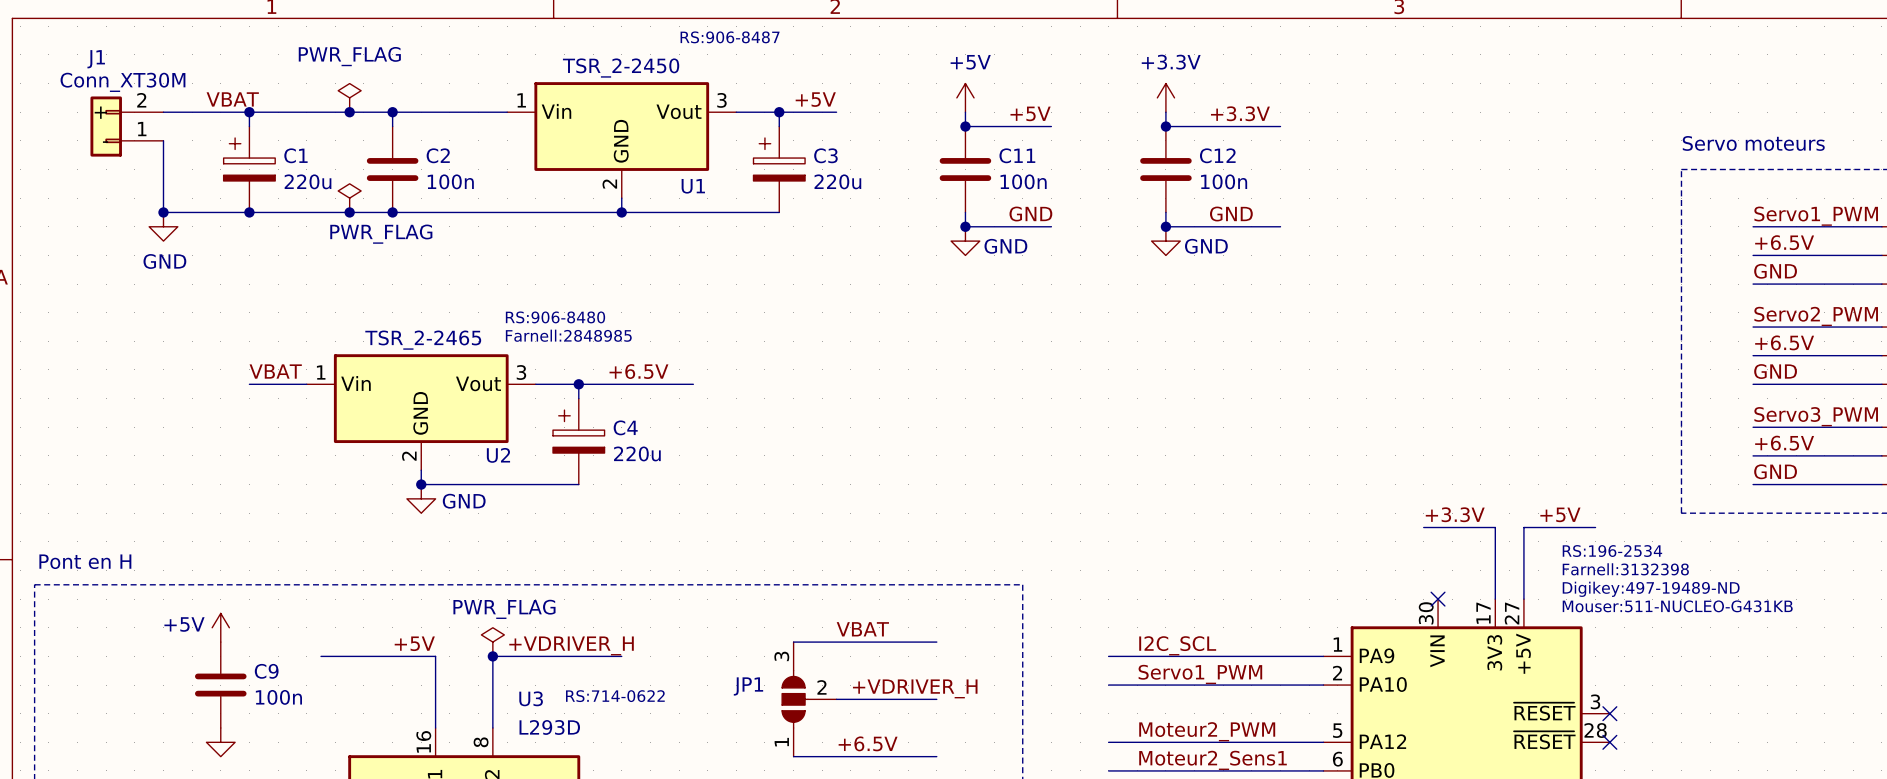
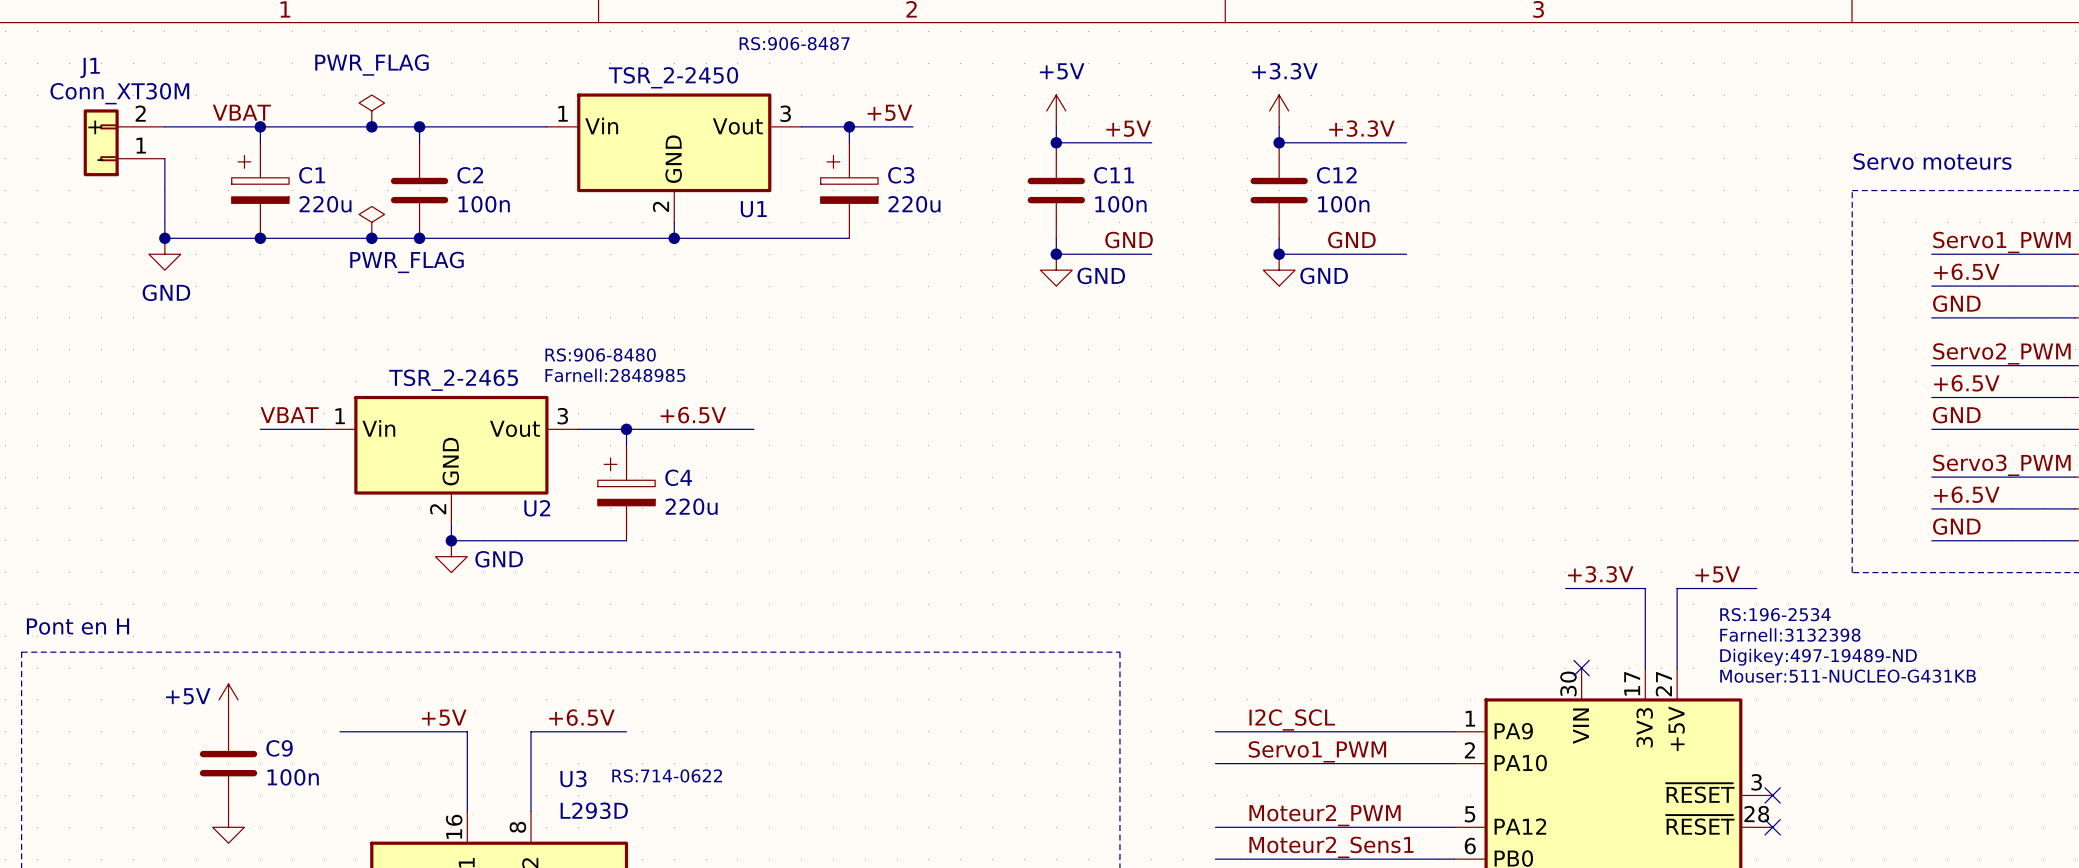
label: VBAT (862, 629) -> none
power symbol: PWR_FLAG (492, 642) -> none
wire: (793, 642) (936, 642) -> none
label: +VDRIVER_H (571, 645) -> +6.5V (581, 717)
junction: (492, 656) -> none
wire: (578, 656) (621, 656) -> none
label: +VDRIVER_H (915, 688) -> none
JP1: (809, 699) -> none
wire: (836, 699) (936, 699) -> none
label: +6.5V (868, 743) -> none
wire: (793, 756) (936, 756) -> none

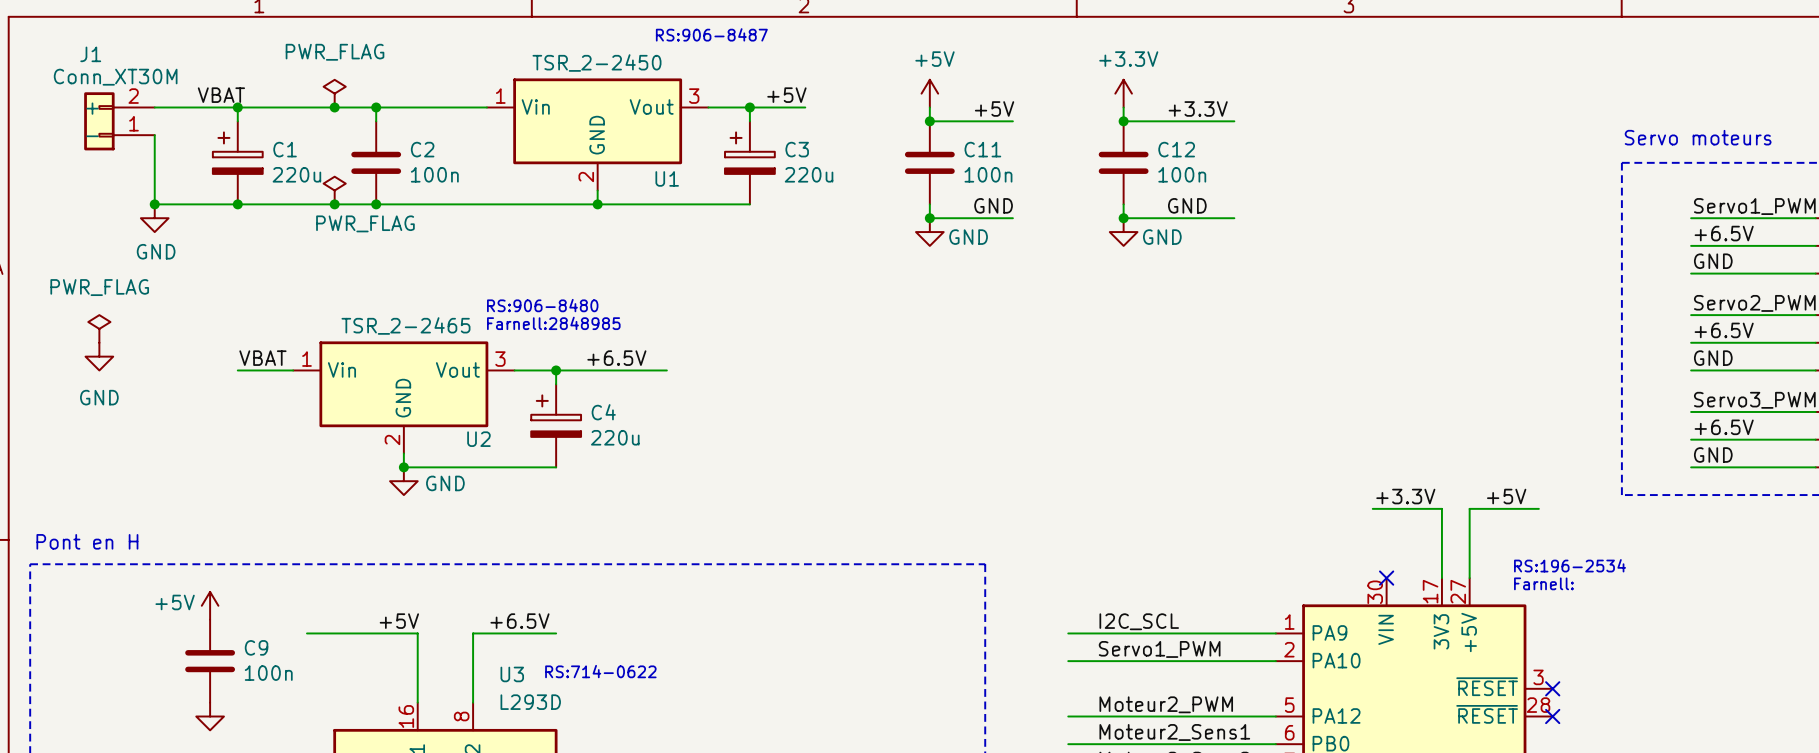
power symbol: none -> PWR_FLAG (99, 328)
power symbol: none -> GND (99, 356)
text: RS:196-2534 (1775, 614) -> none
text: Farnell:3132398 (1790, 635) -> none
text: Digikey:497-19489-ND (1818, 657) -> RS:196-2534 (1570, 565)
text: Mouser:511-NUCLEO-G431KB (1848, 676) -> Farnell: (1543, 583)

